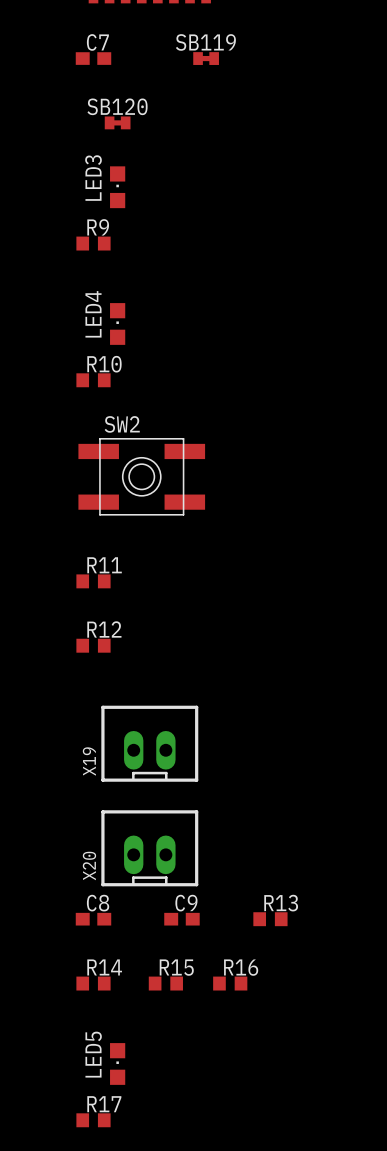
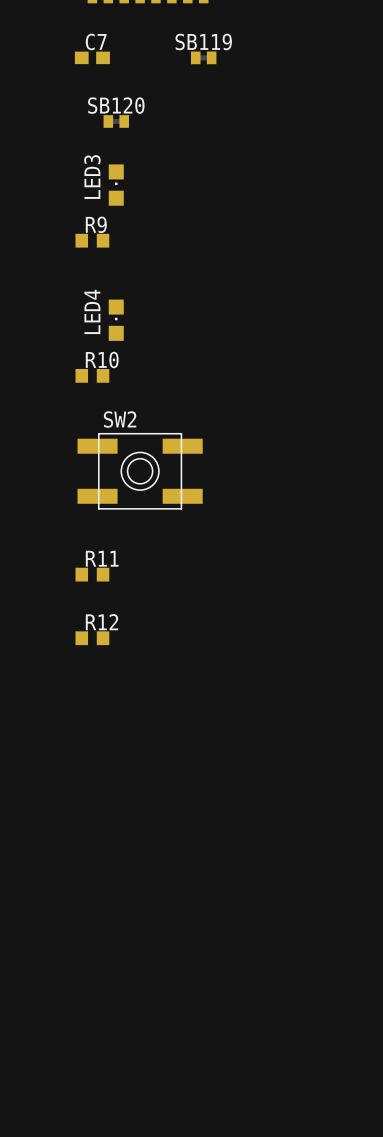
X19: (149, 743) -> none
X20: (149, 848) -> none
C8: (93, 919) -> none
C9: (181, 919) -> none
R13: (270, 919) -> none
R14: (93, 983) -> none
R15: (165, 983) -> none
R16: (230, 983) -> none
LED5: (117, 1063) -> none
R17: (93, 1120) -> none

